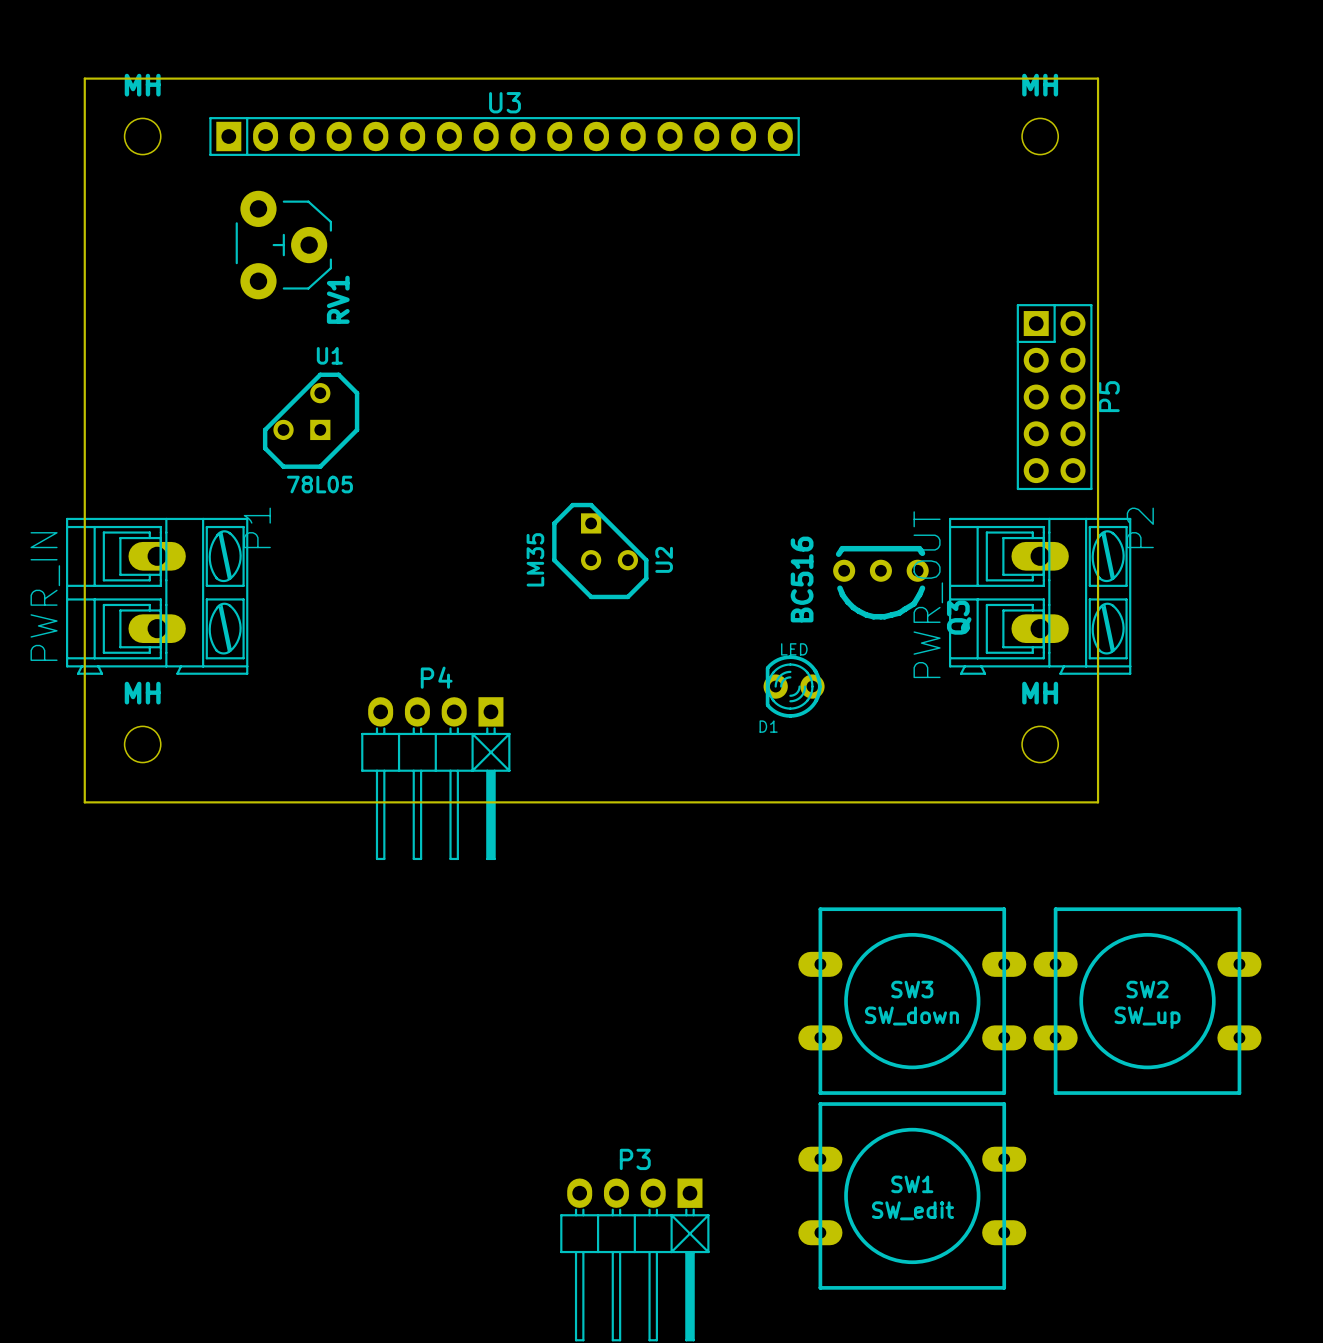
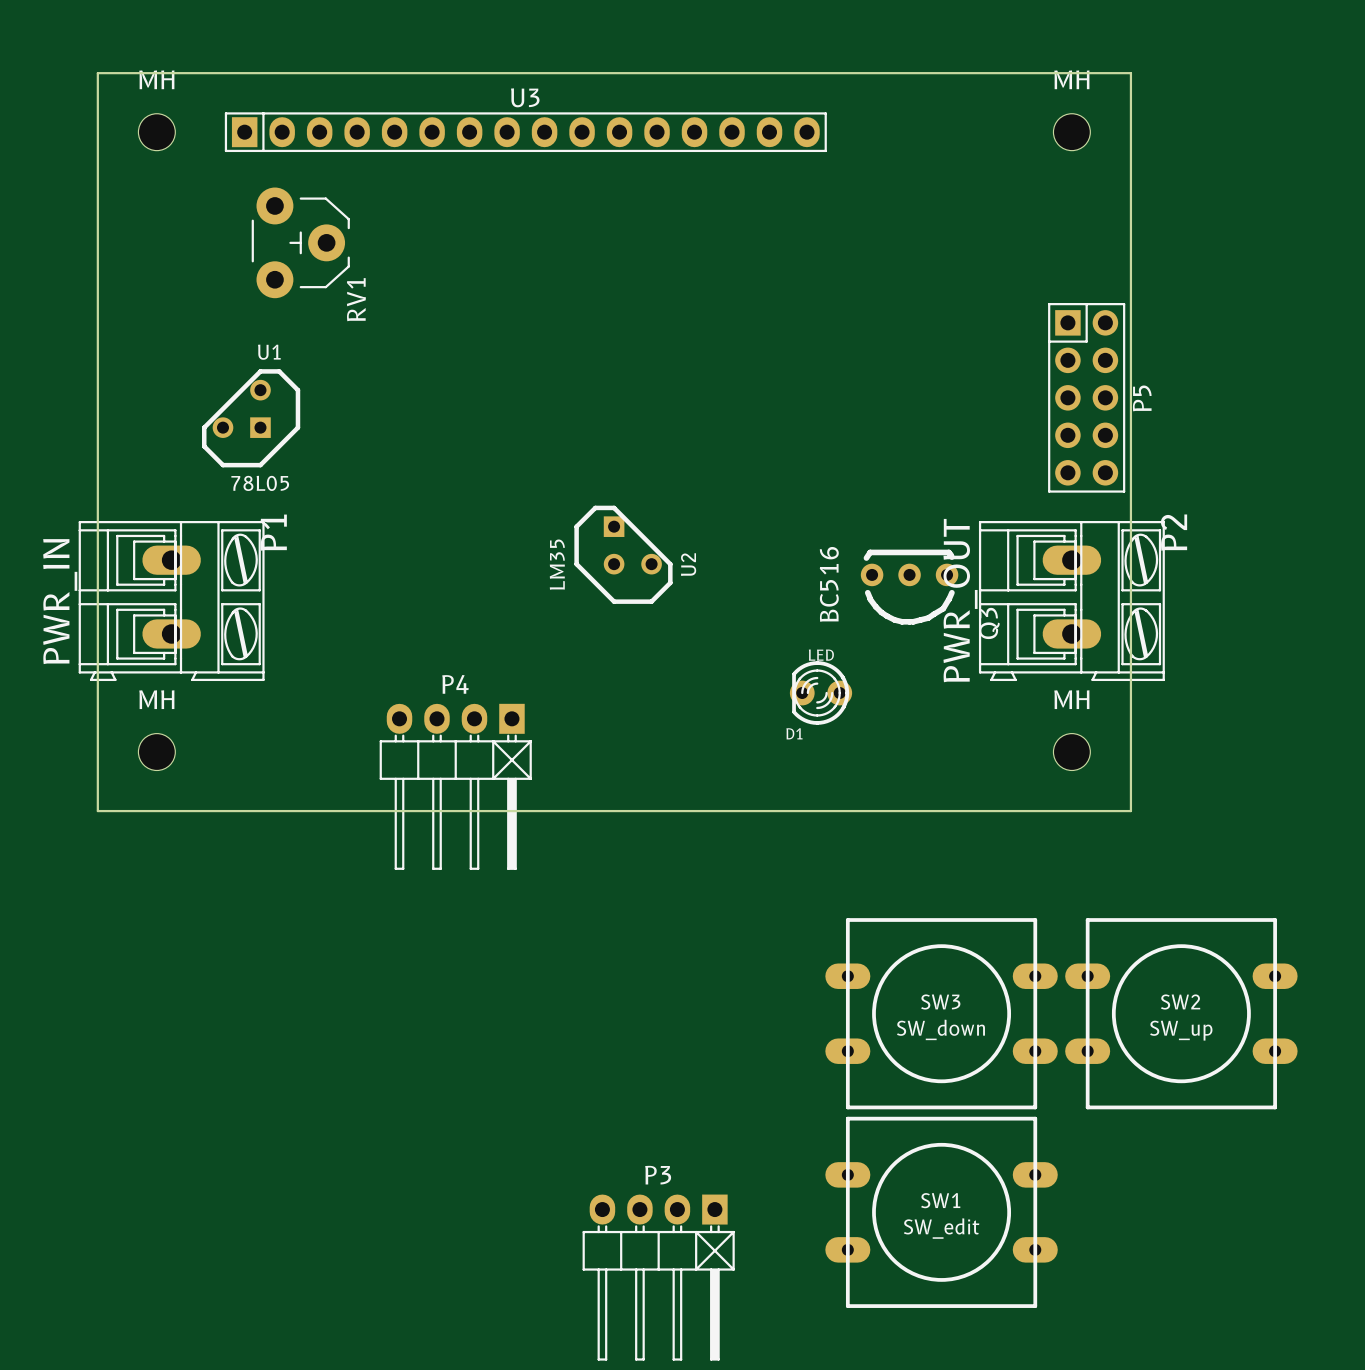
U1 position: (311, 420) -> (251, 418)

